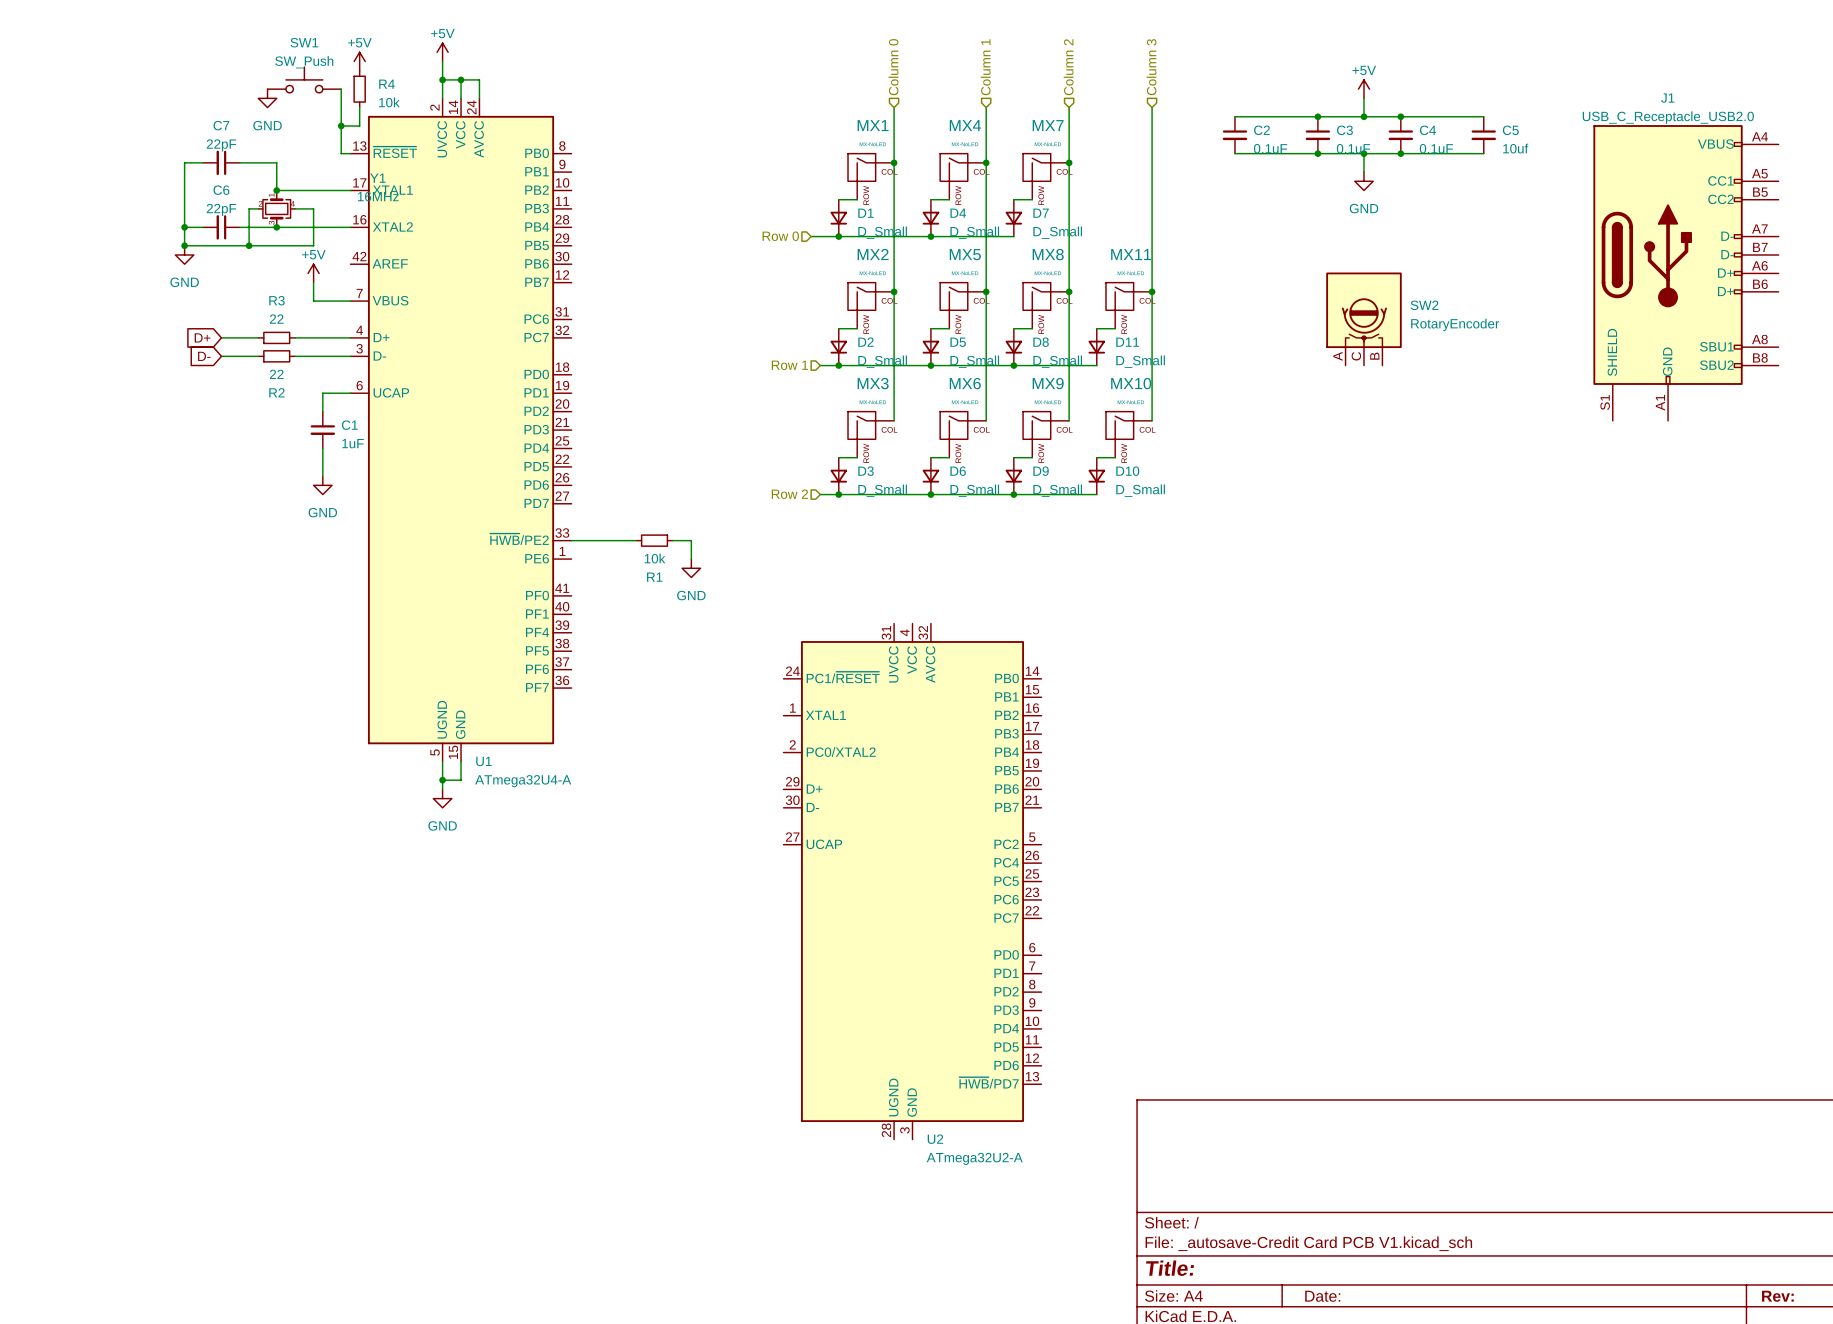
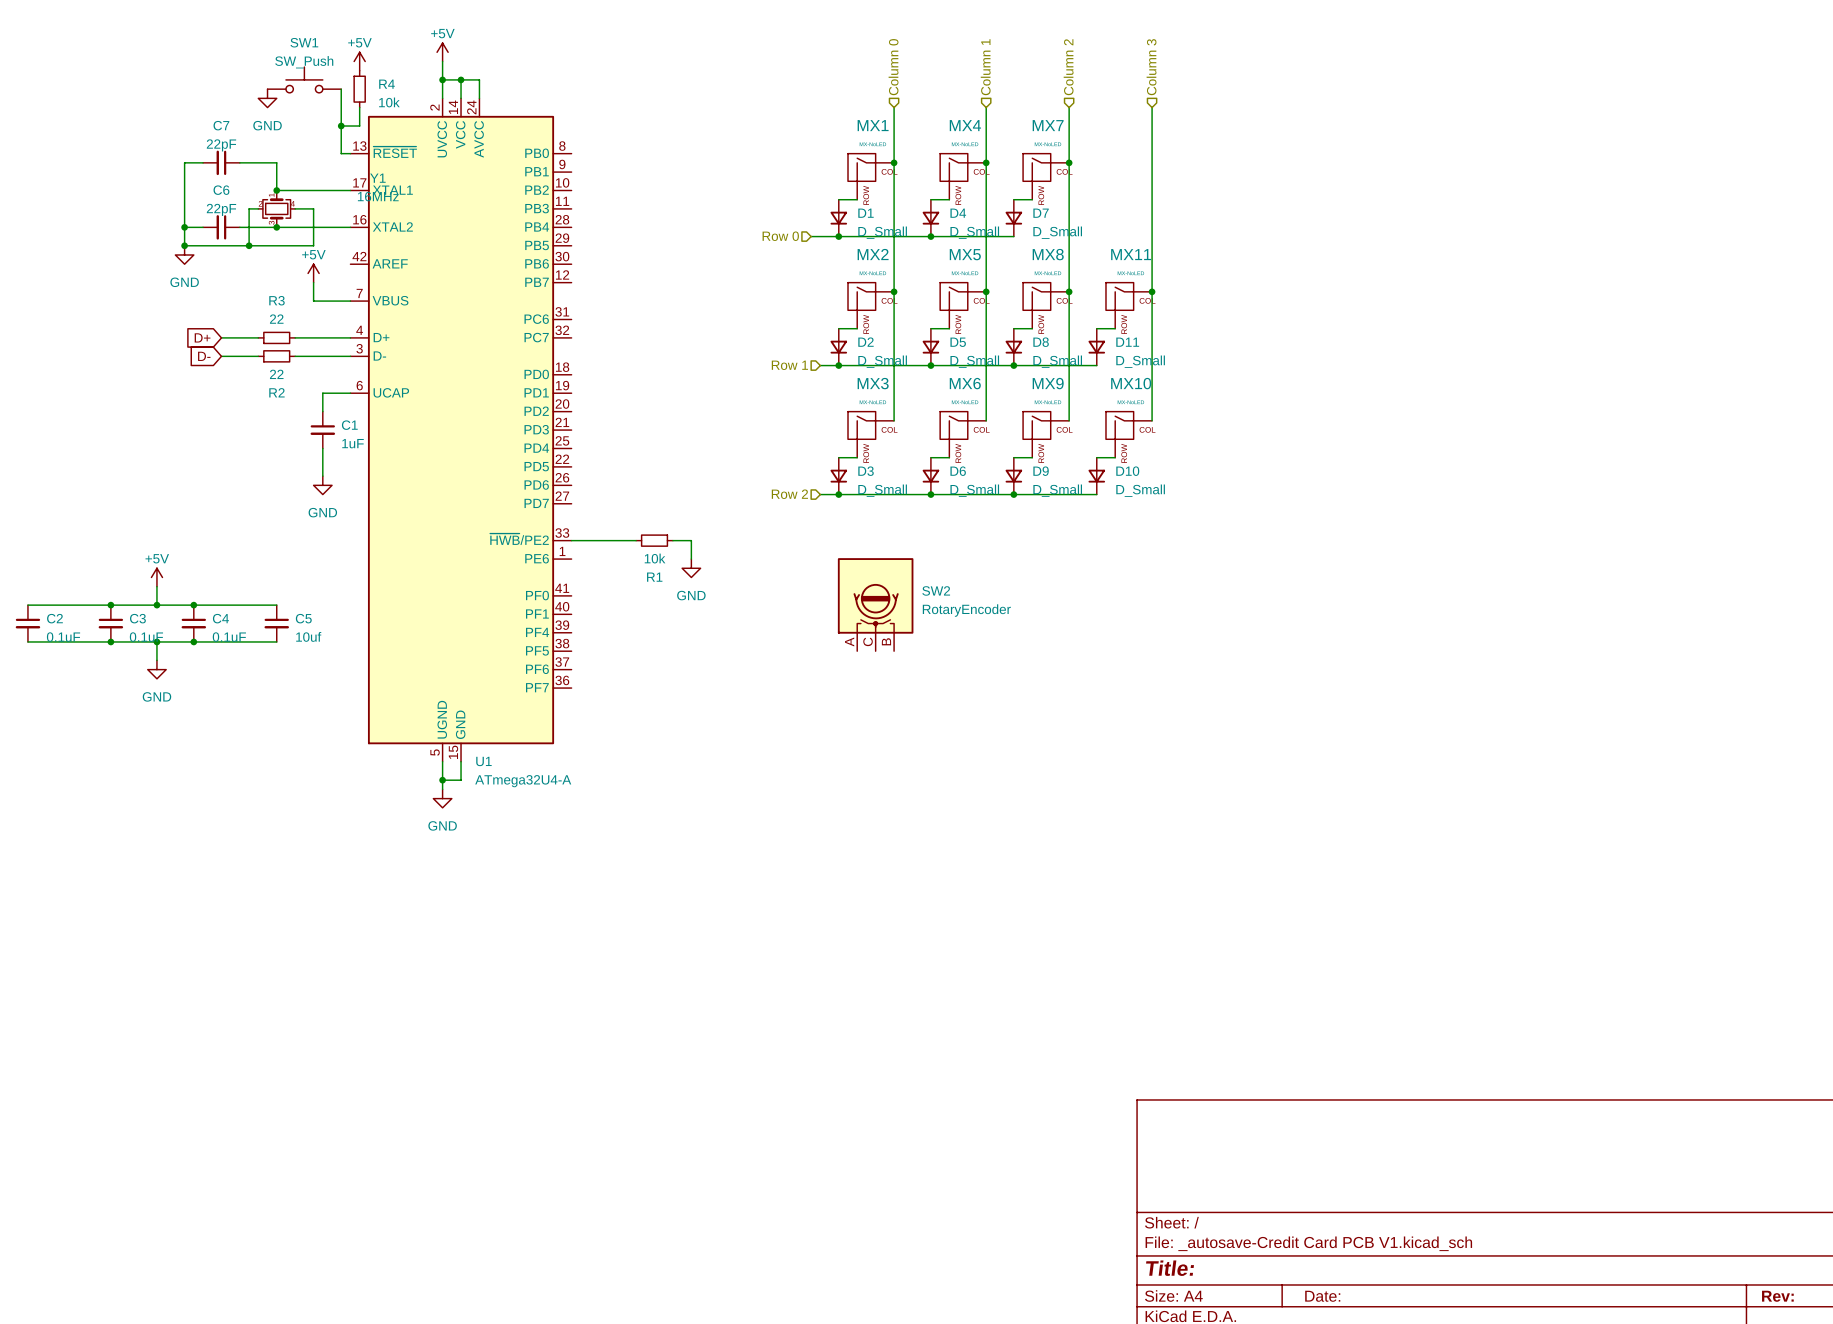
power symbol: +5V (1363, 89) -> none
wire: (1363, 98) (1363, 116) -> none
wire: (1234, 116) (1483, 116) -> none
junction: (1317, 116) -> none
junction: (1363, 116) -> none
junction: (1400, 116) -> none
C2 position: (1234, 135) -> (27, 623)
C3 position: (1317, 135) -> (110, 623)
C4 position: (1400, 135) -> (193, 623)
C5 position: (1483, 135) -> (276, 623)
wire: (1234, 153) (1483, 153) -> none
junction: (1317, 153) -> none
wire: (1363, 153) (1363, 172) -> none
junction: (1363, 153) -> none
junction: (1400, 153) -> none
power symbol: GND (1363, 181) -> none
J1: USB_C_Receptacle_USB2.0 (1686, 272) -> none
SW2 position: (1363, 319) -> (875, 604)
power symbol: none -> +5V (156, 577)
wire: none -> (156, 586) (156, 605)
wire: none -> (27, 605) (276, 605)
junction: none -> (110, 605)
junction: none -> (156, 605)
junction: none -> (193, 605)
wire: none -> (27, 641) (276, 641)
junction: none -> (110, 641)
wire: none -> (156, 641) (156, 660)
junction: none -> (156, 641)
junction: none -> (193, 641)
power symbol: none -> GND (156, 669)
U2: ATmega32U2-A (912, 881) -> none

